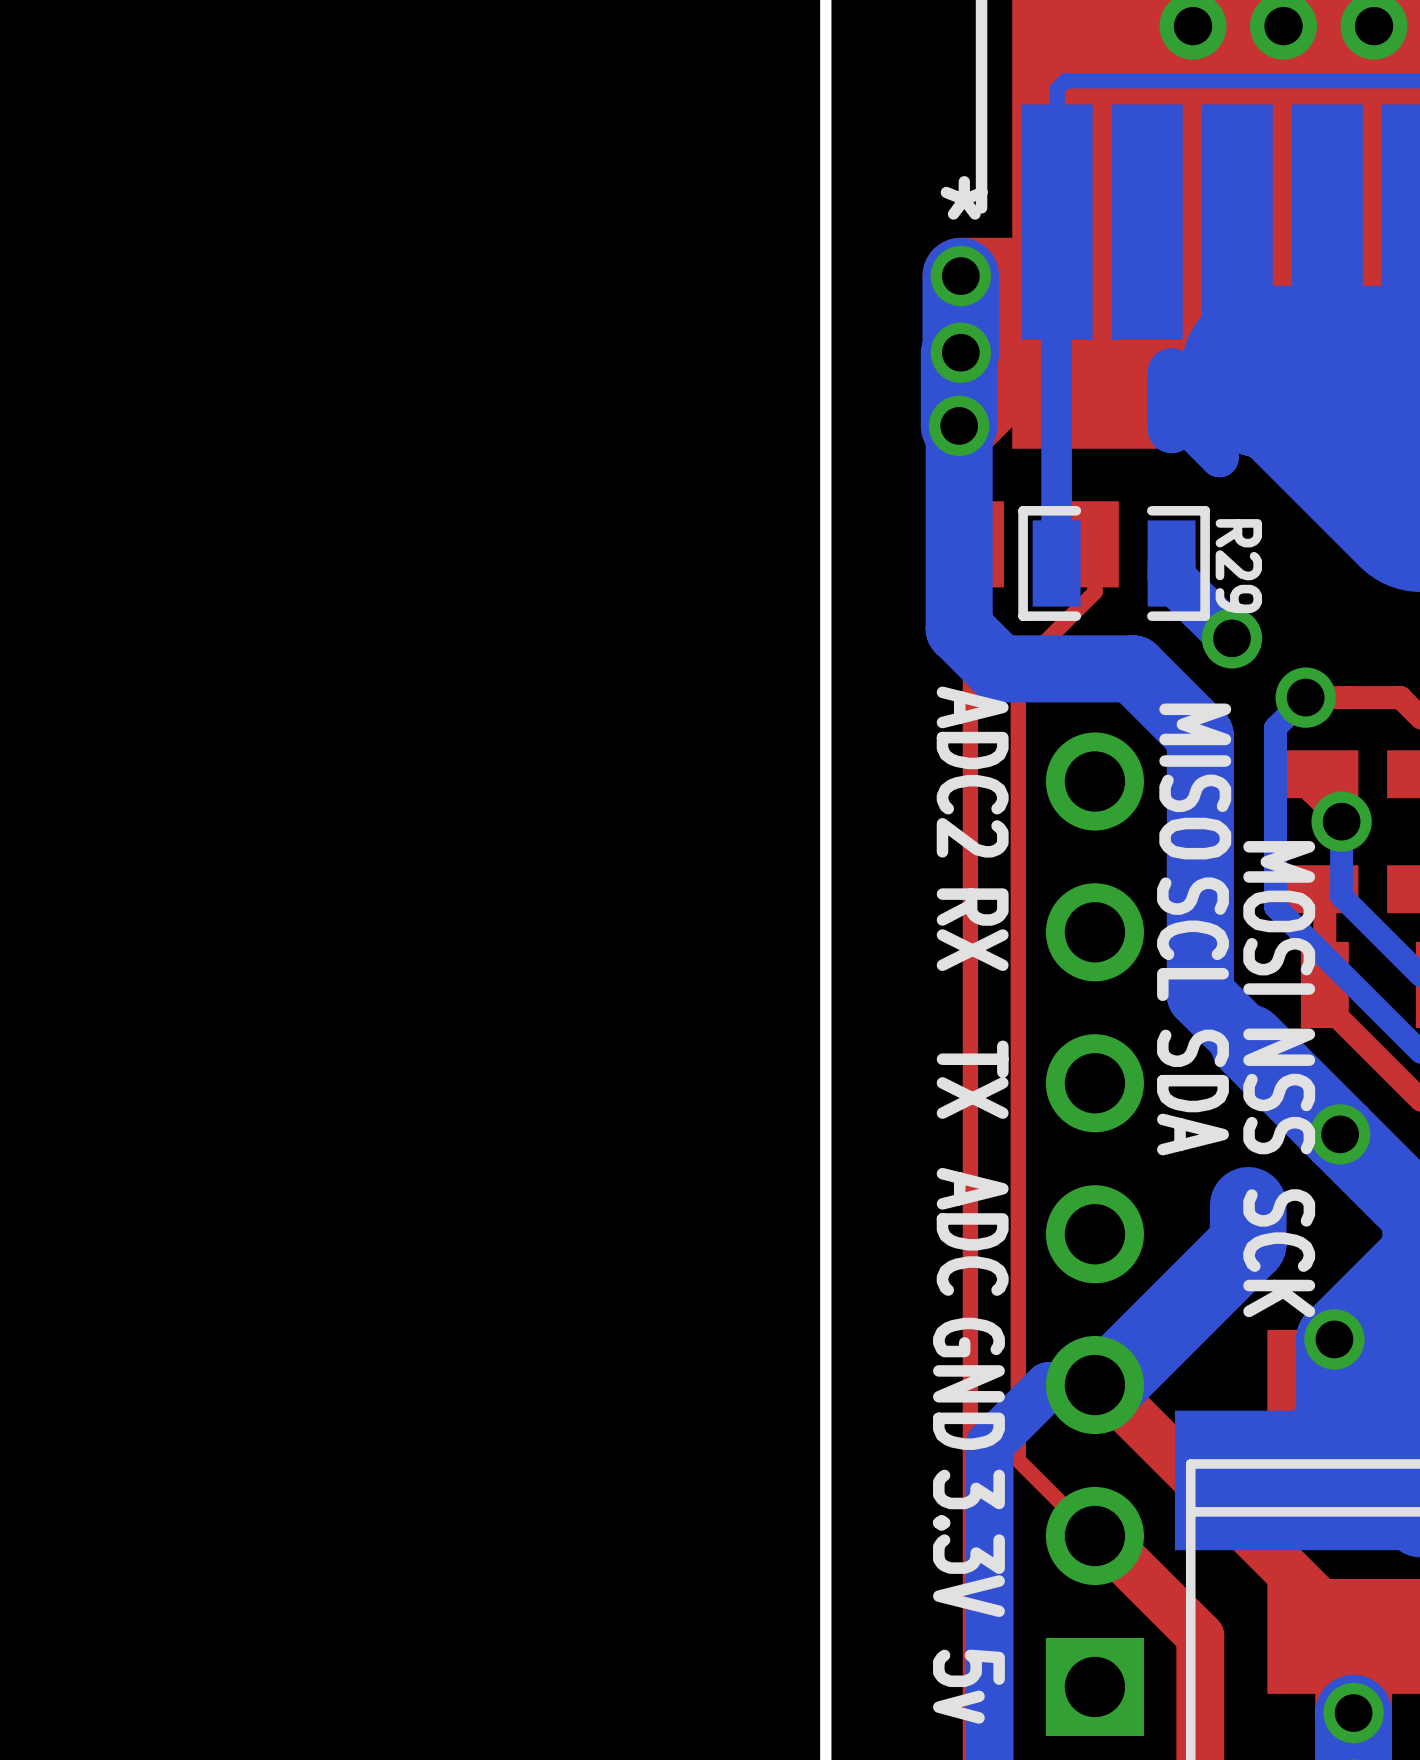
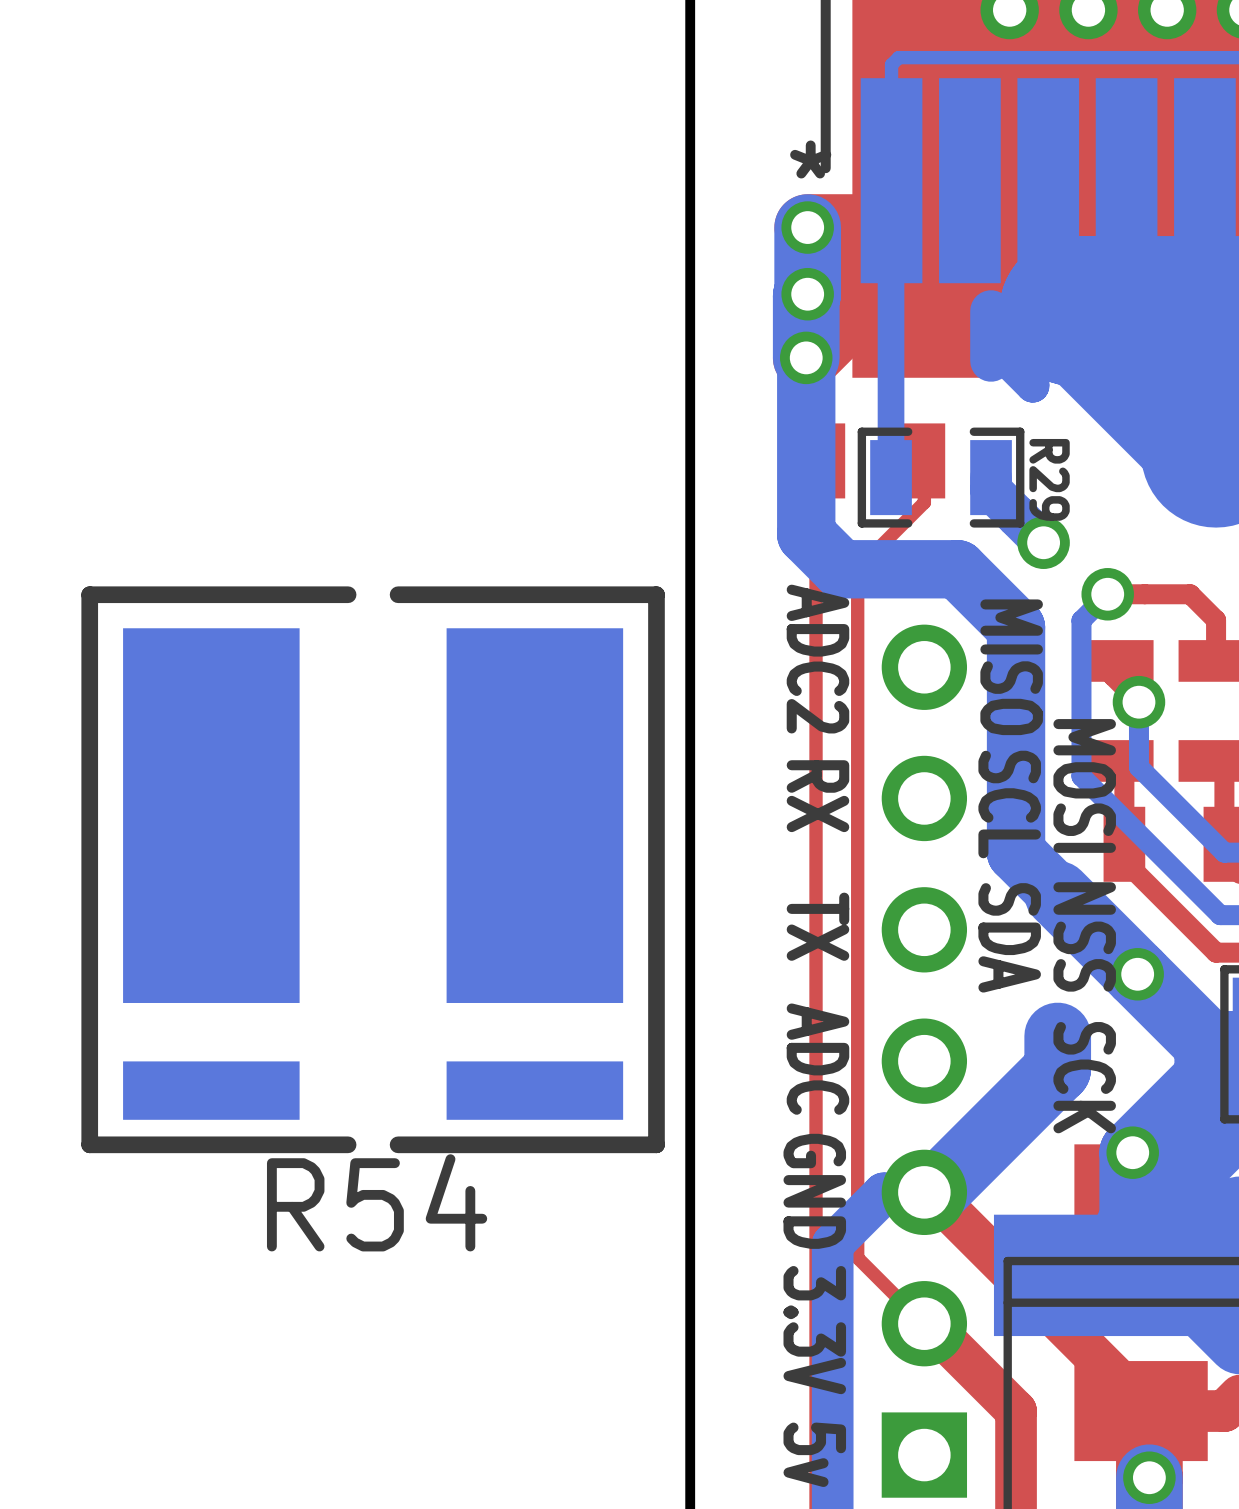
R54: none -> (373, 869)

